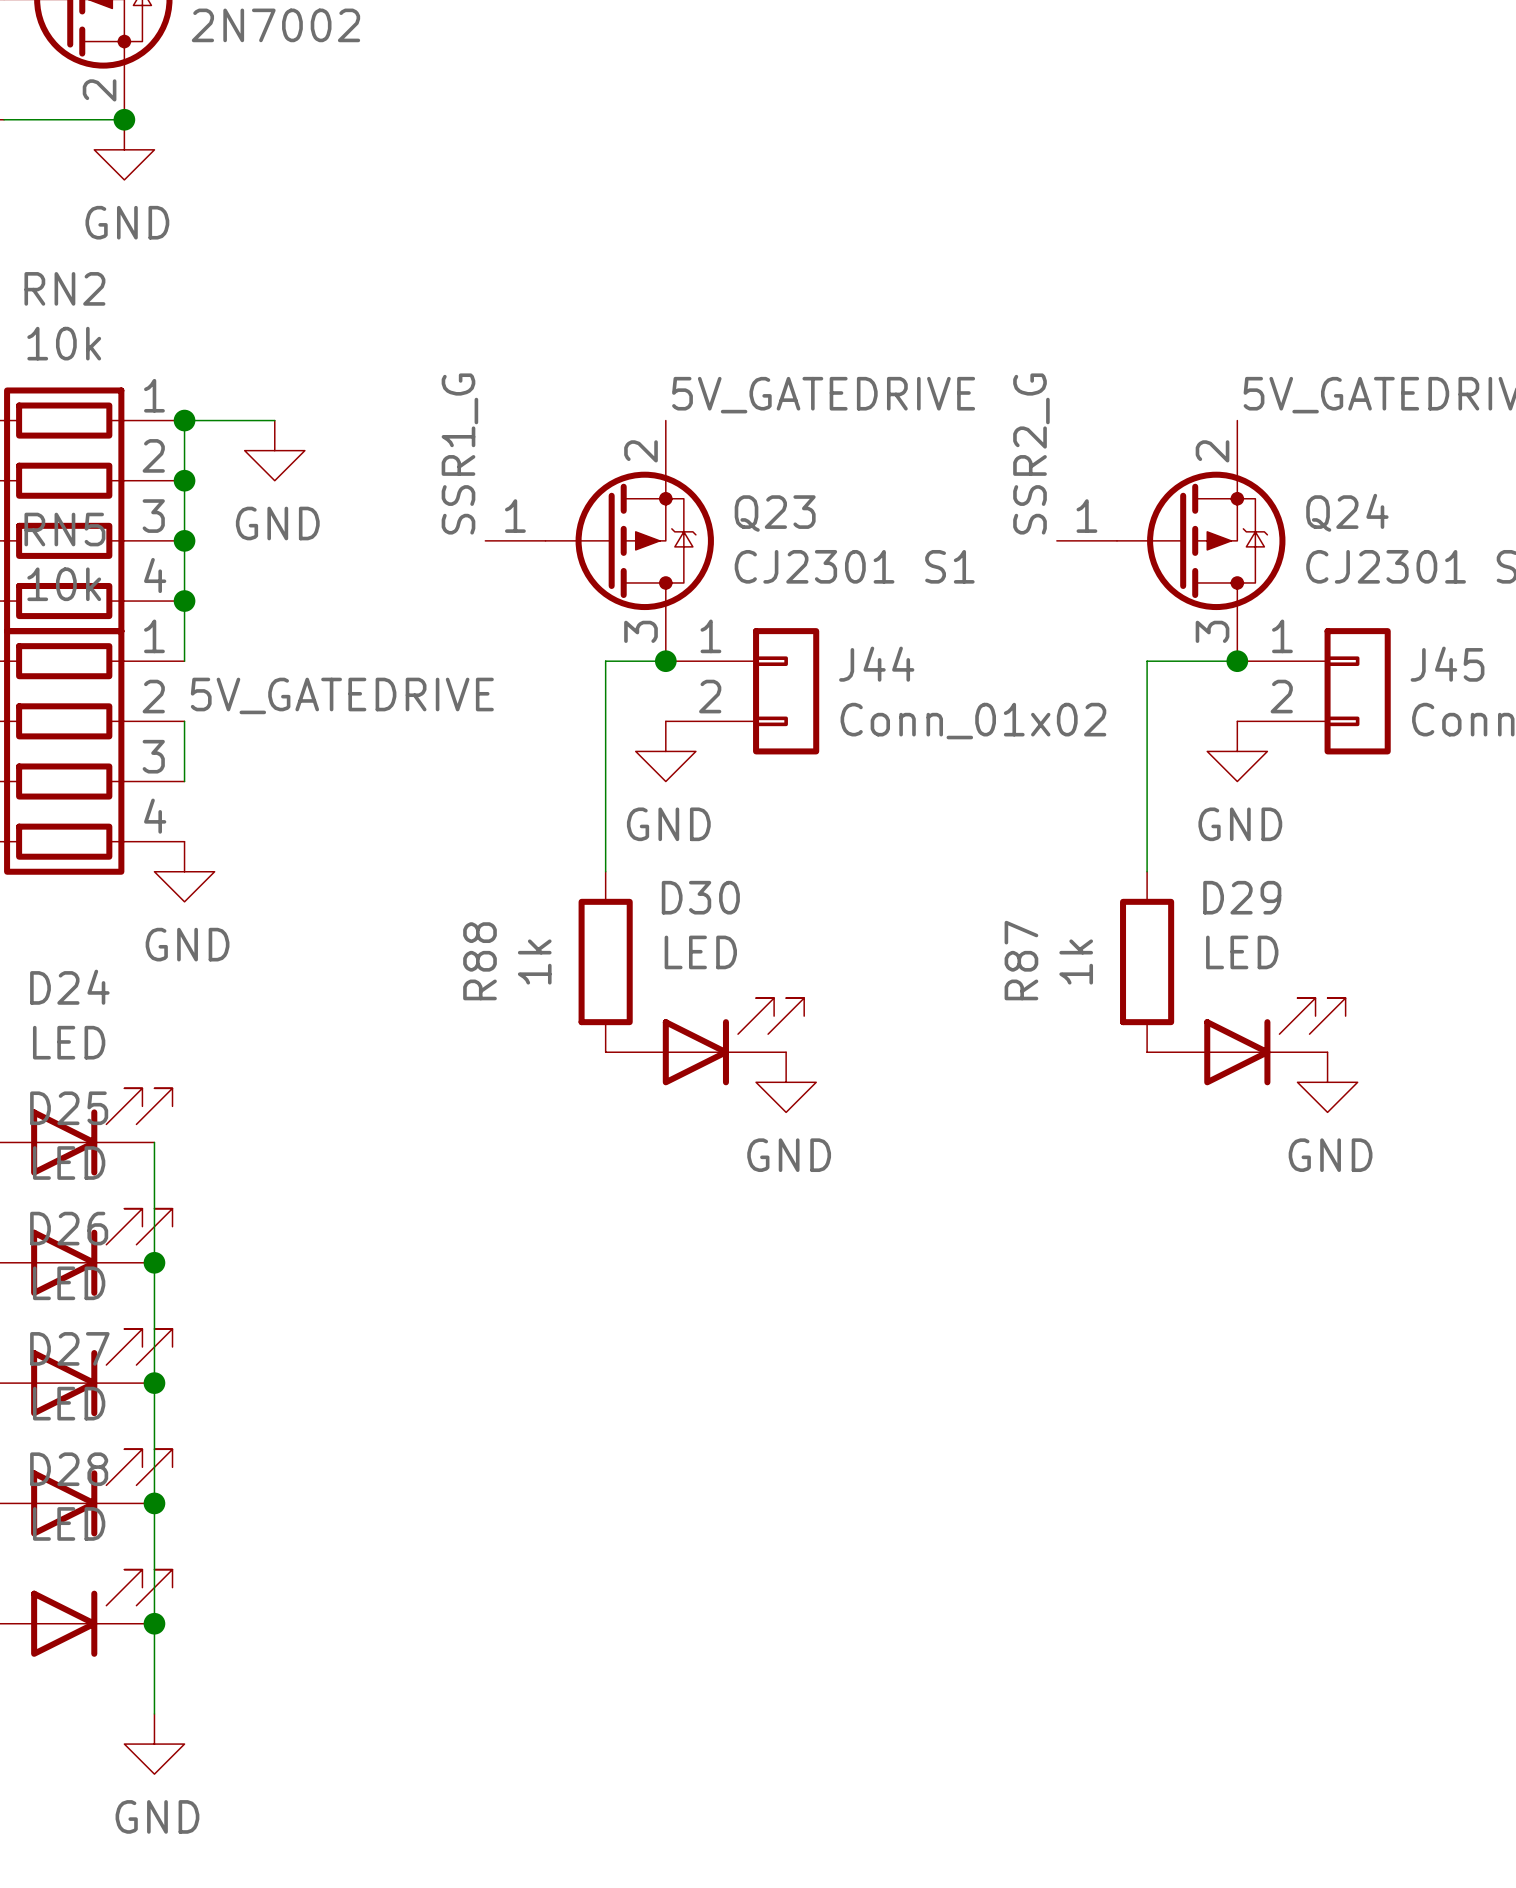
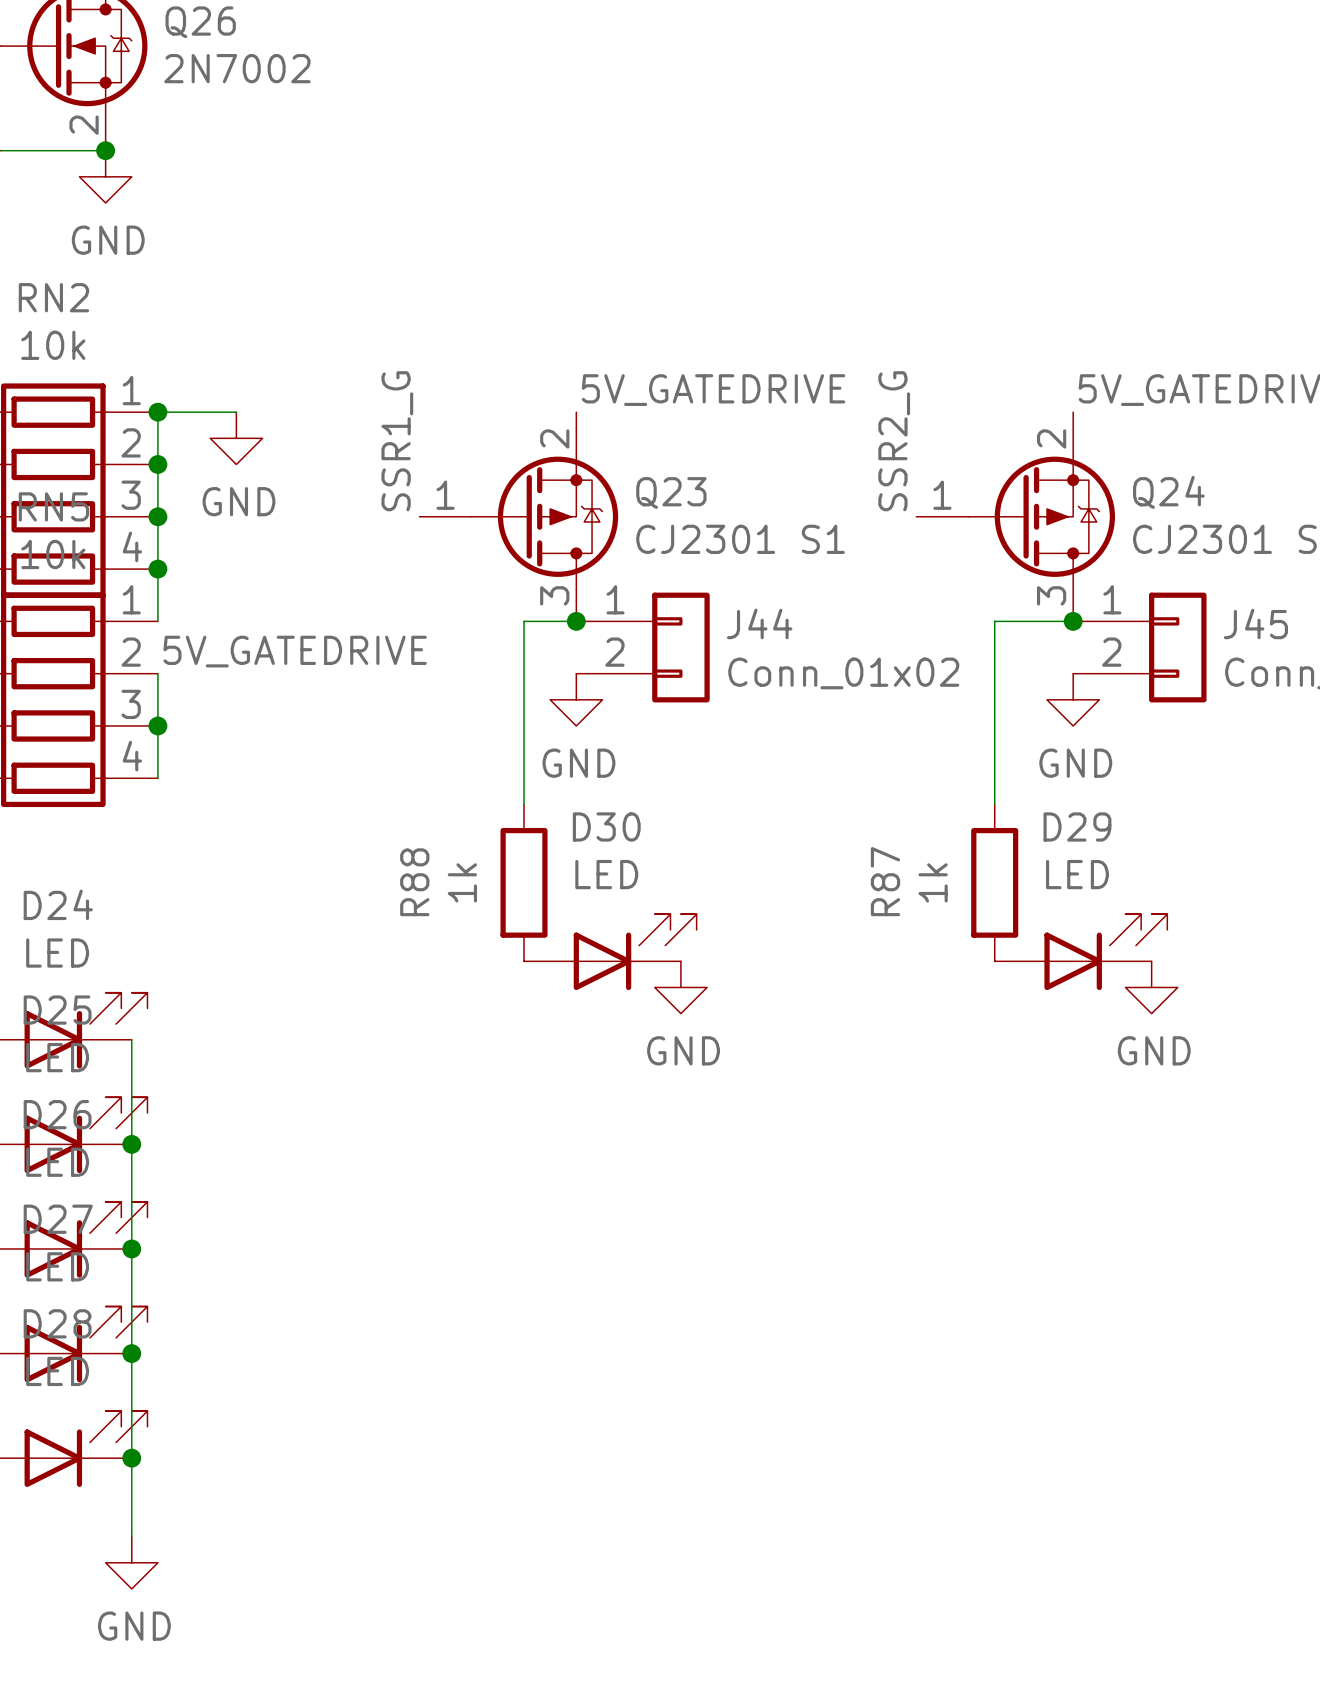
wire: none -> (157, 725) (157, 778)
junction: none -> (157, 725)
power symbol: GND (184, 871) -> none

